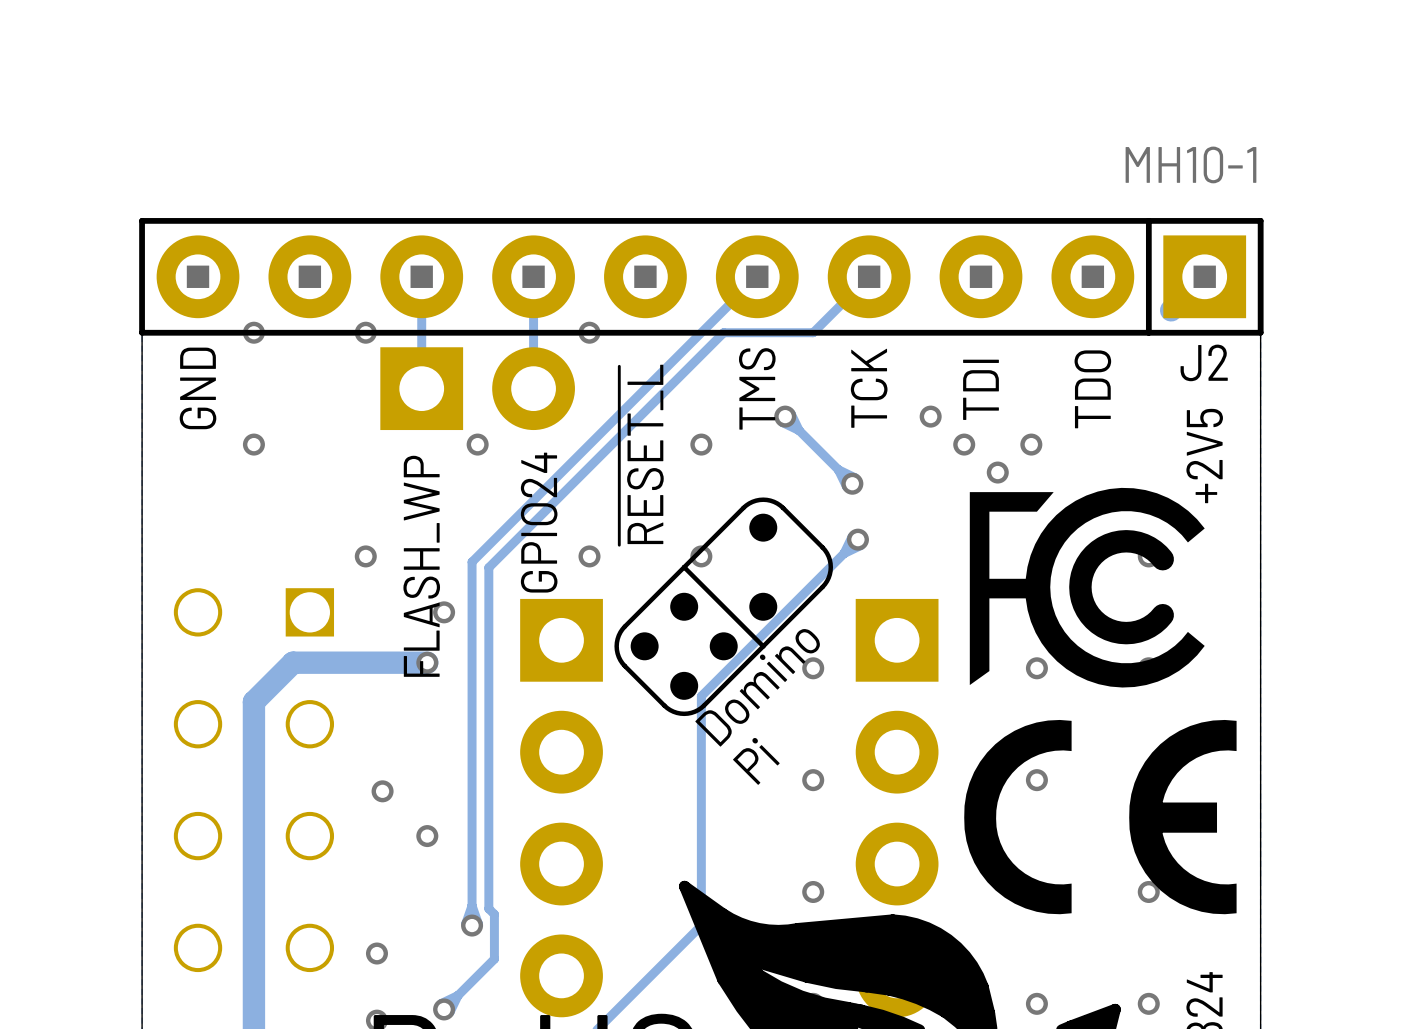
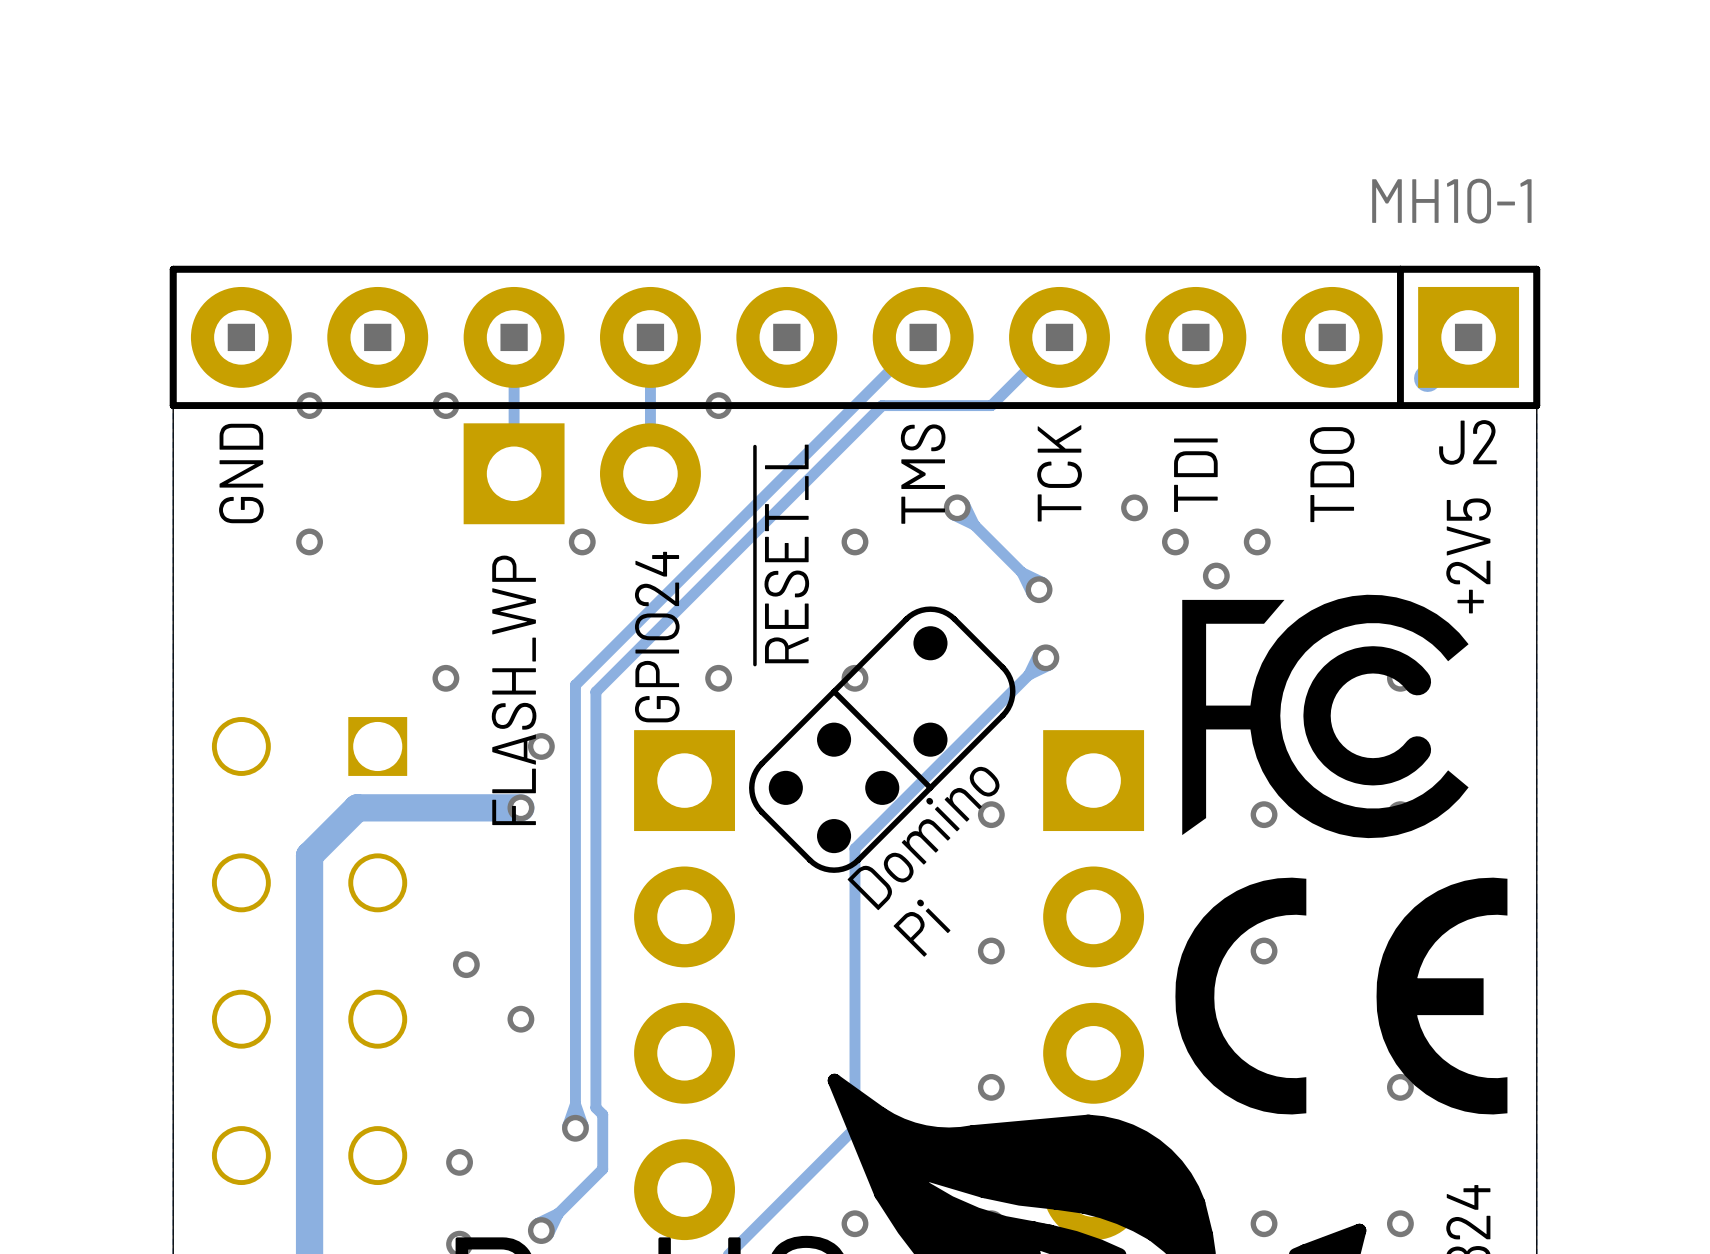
via: none -> (854, 1223)

